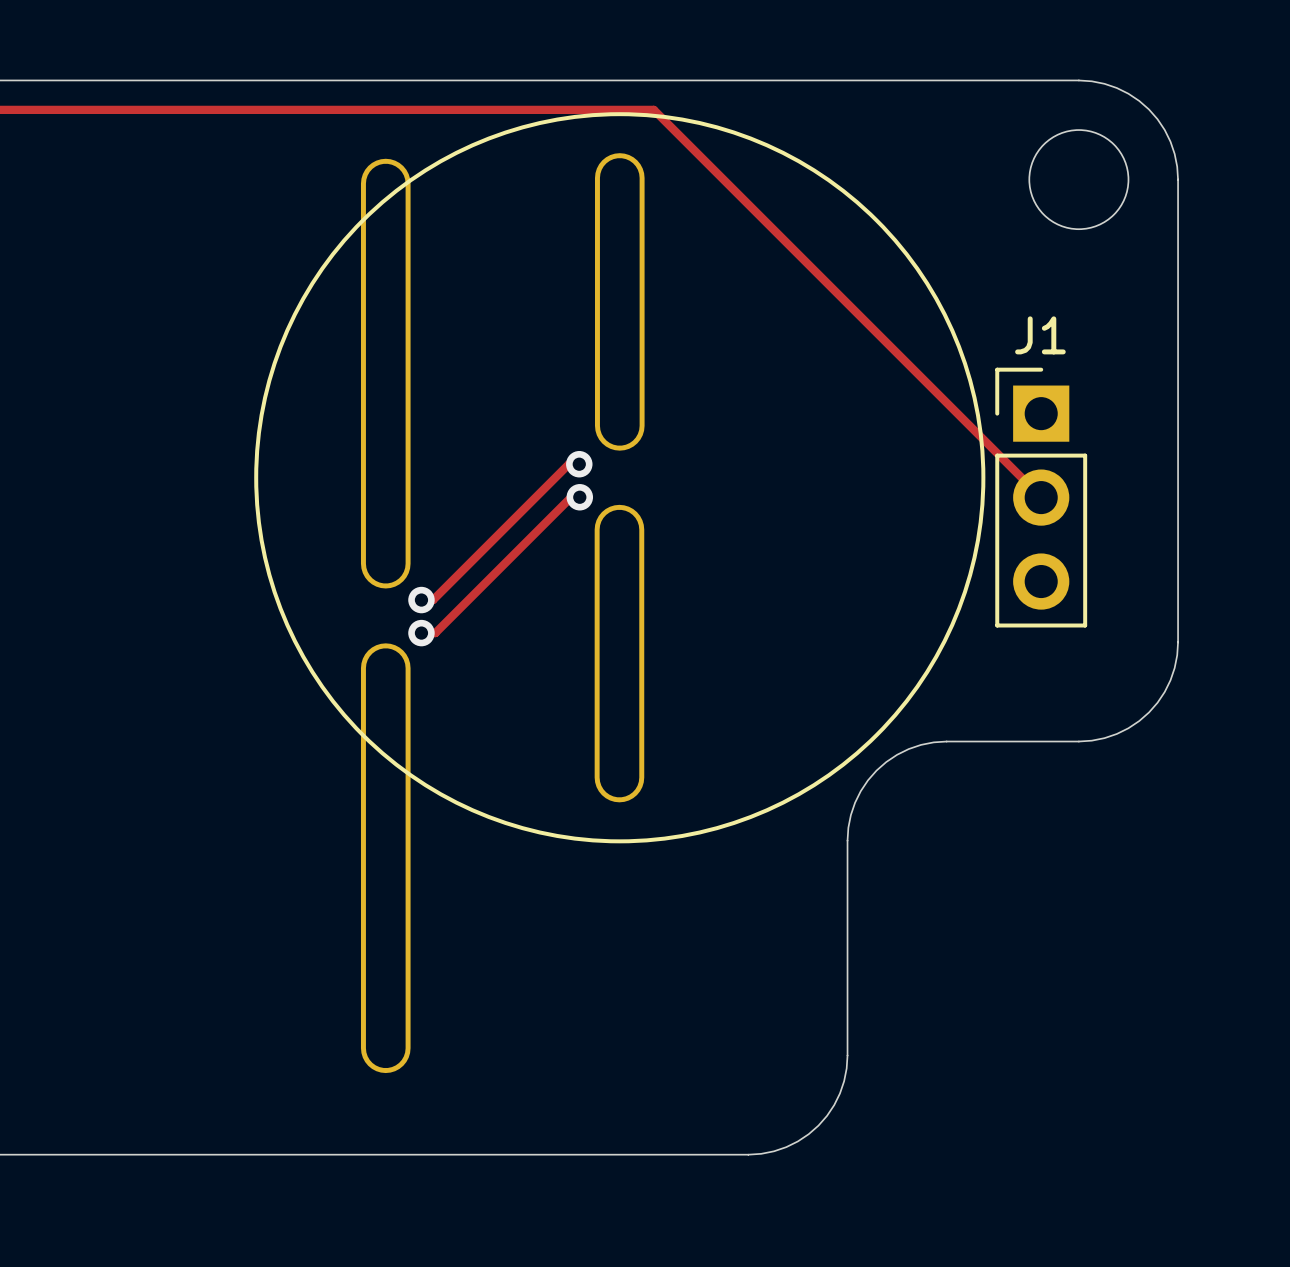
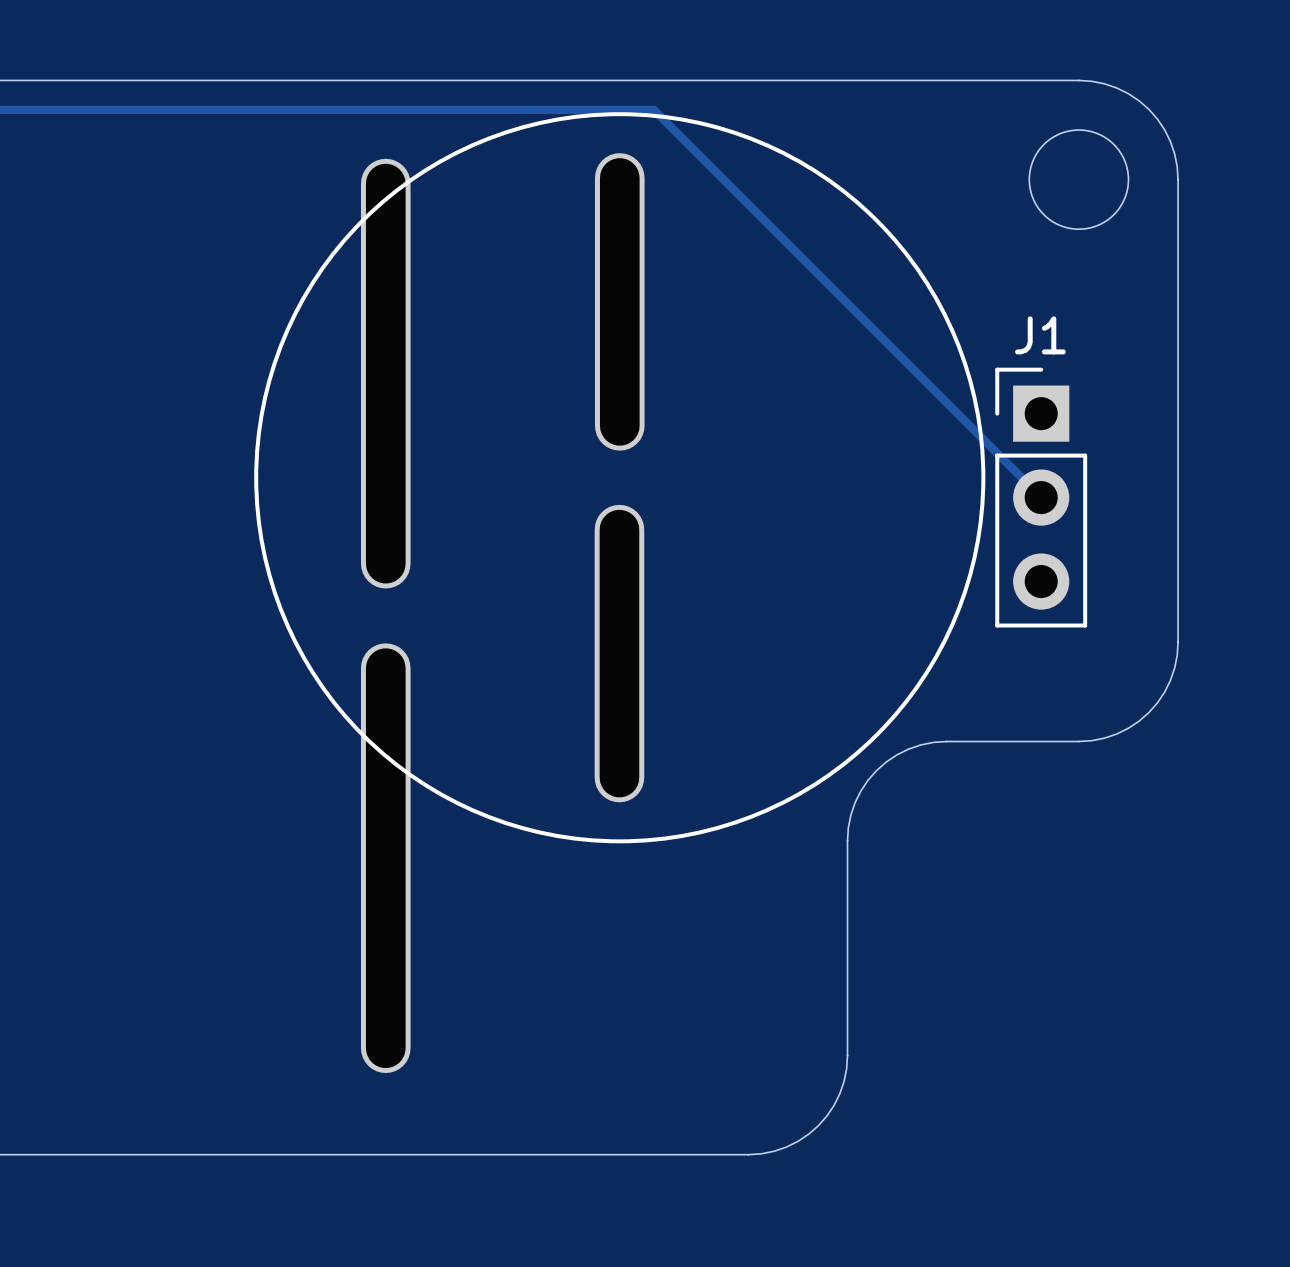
track: (579, 464) (568, 464) (433, 600) (421, 600) -> none
via: (579, 464) -> none
track: (579, 497) (571, 497) (435, 633) (421, 633) -> none
via: (579, 497) -> none
via: (421, 600) -> none
via: (421, 633) -> none

